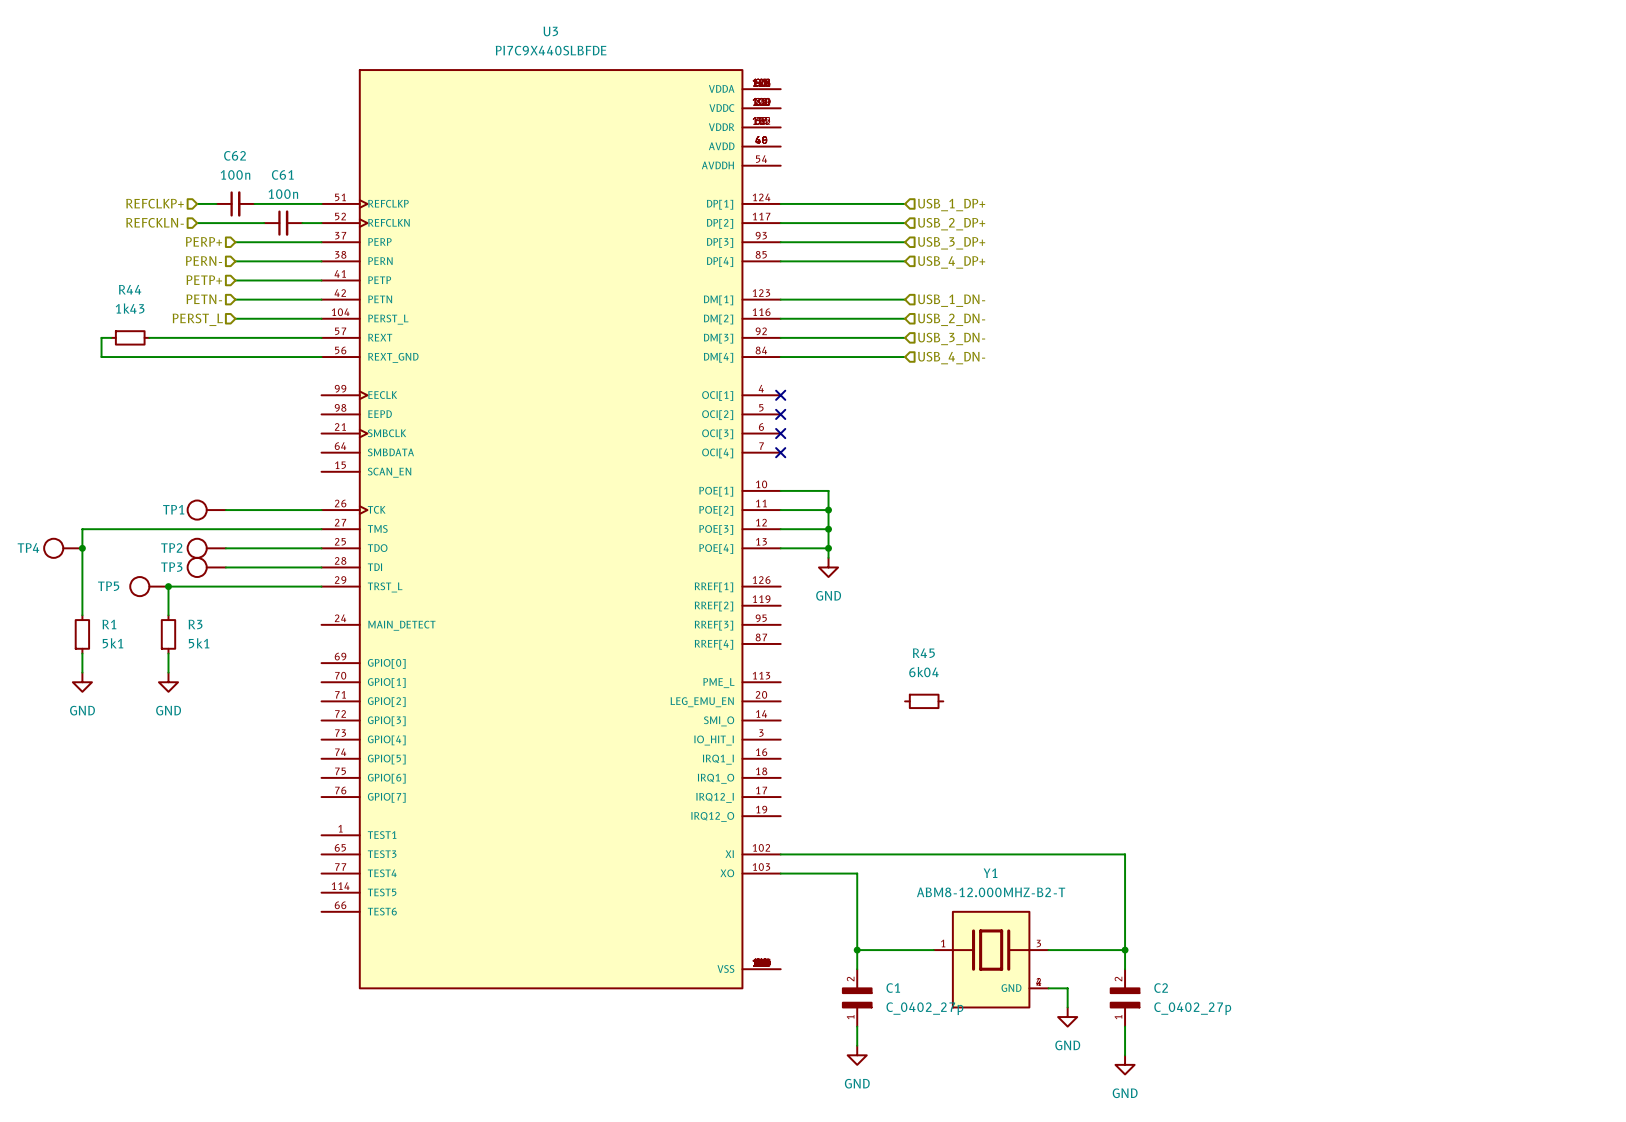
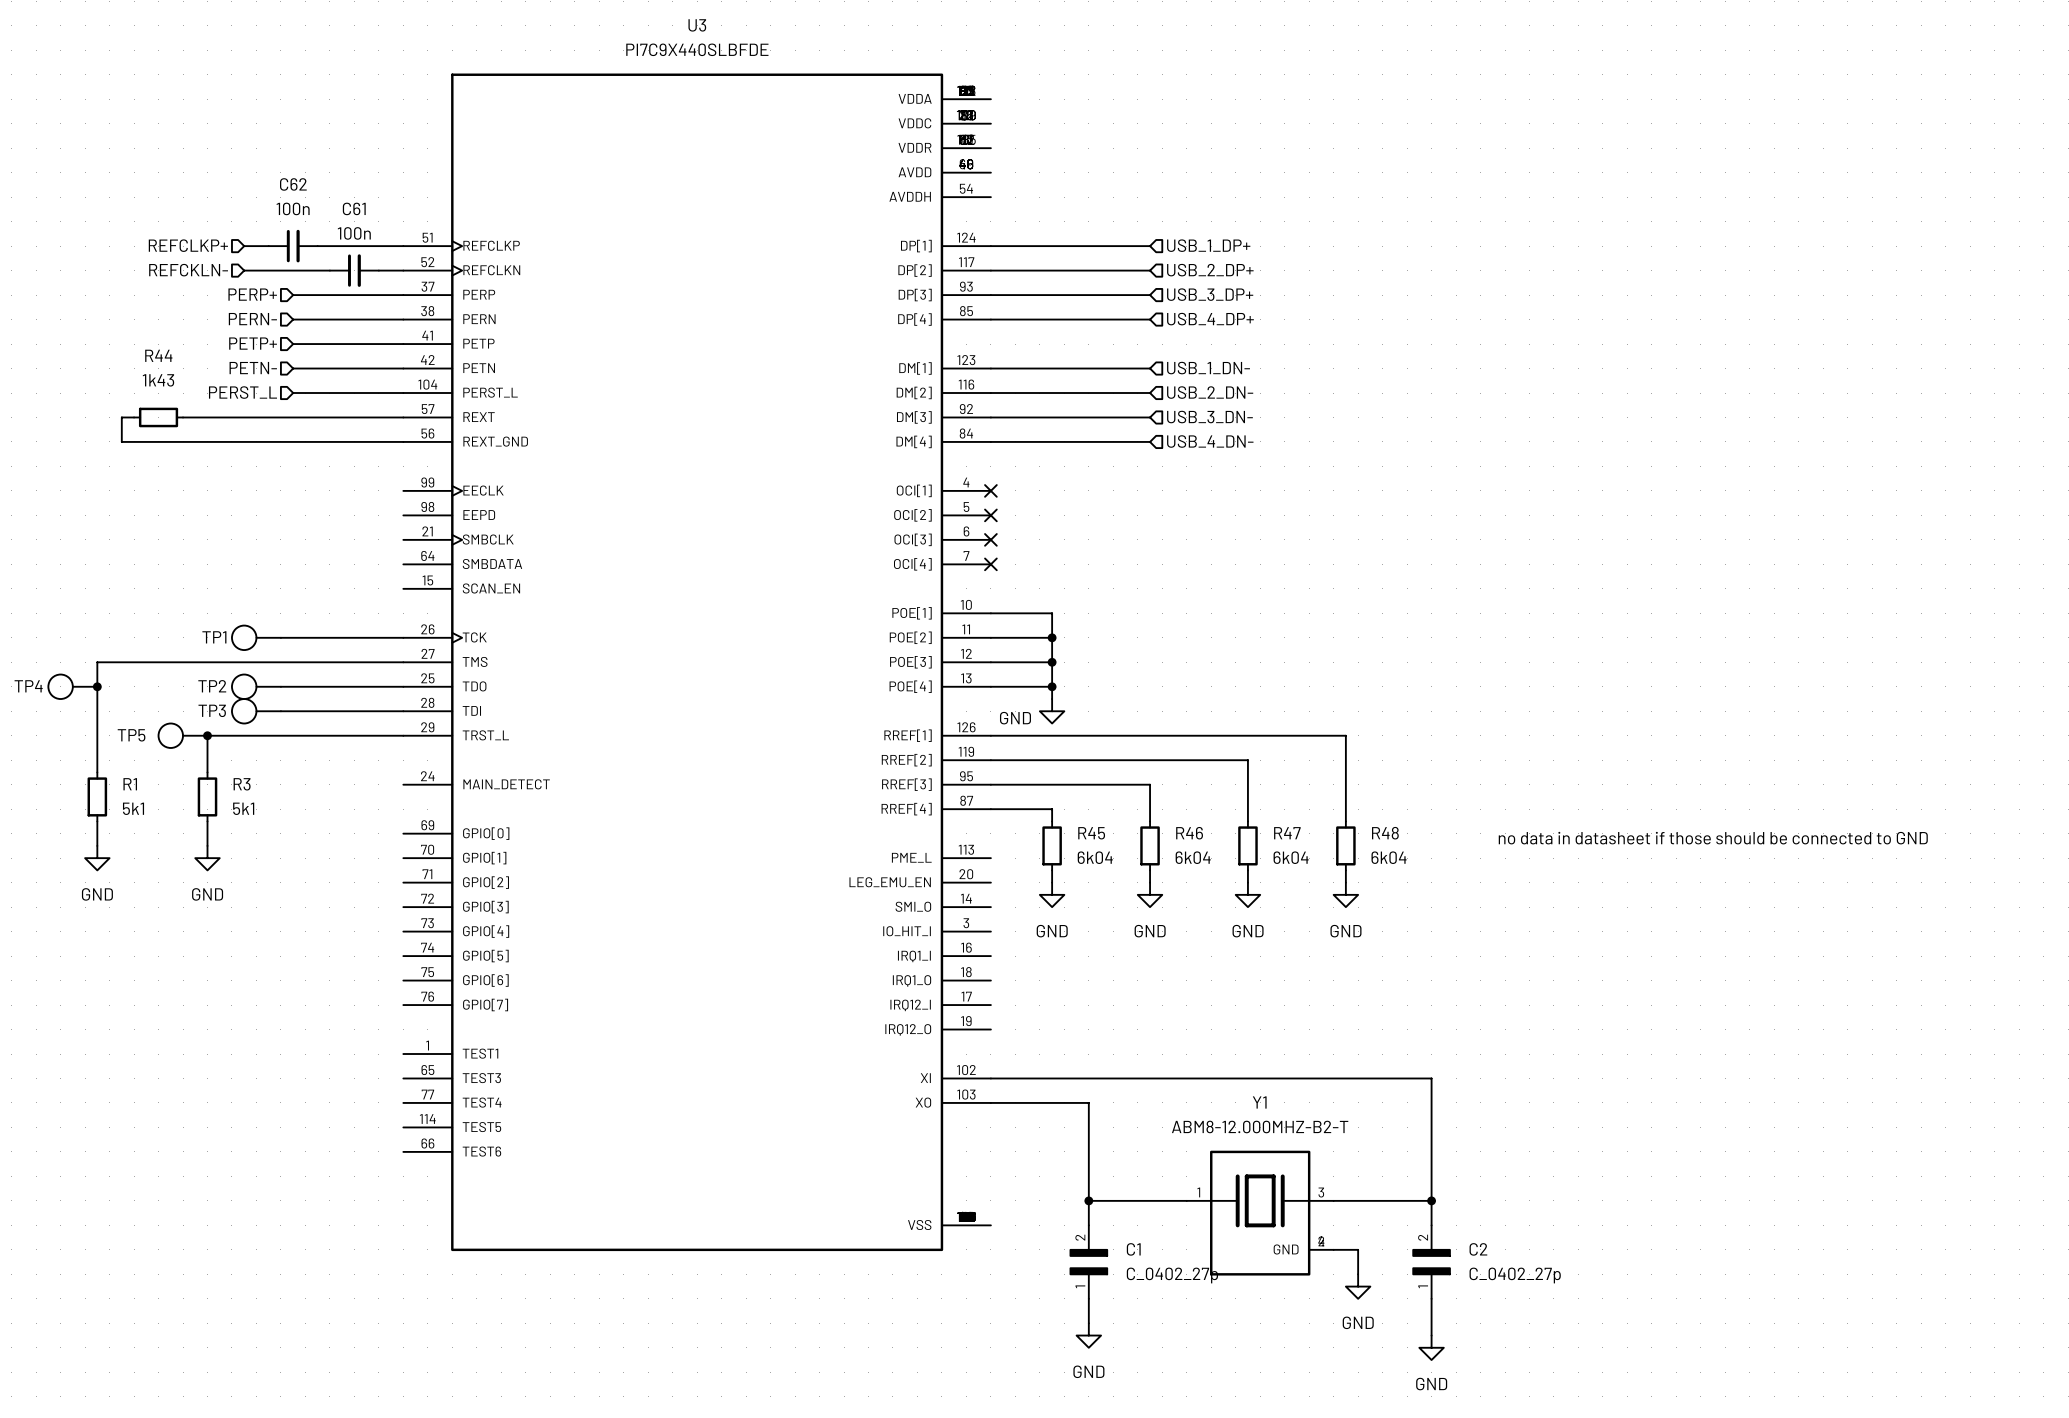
wire: none -> (990, 735) (1345, 735) (1345, 821)
power symbol text position: GND (828, 595) -> GND (1015, 718)
wire: none -> (990, 760) (1247, 760) (1247, 821)
wire: none -> (990, 784) (1150, 784) (1150, 821)
wire: none -> (990, 809) (1052, 809) (1052, 821)
R45 name position: R45 (923, 653) -> R45 (1091, 833)
text: none -> no data in datasheet if those should be connected to GND (1713, 838)
R46: none -> (1150, 845)
R47: none -> (1247, 845)
R48: none -> (1345, 845)
wire: none -> (1052, 870) (1052, 882)
wire: none -> (1150, 870) (1150, 882)
wire: none -> (1247, 870) (1247, 882)
wire: none -> (1345, 870) (1345, 882)
R45 rotation: 0° (924, 701) -> 90° clockwise (1052, 845)
R45 position: (924, 701) -> (1052, 845)
power symbol: none -> GND (1052, 894)
power symbol: none -> GND (1150, 894)
power symbol: none -> GND (1247, 894)
power symbol: none -> GND (1345, 894)

